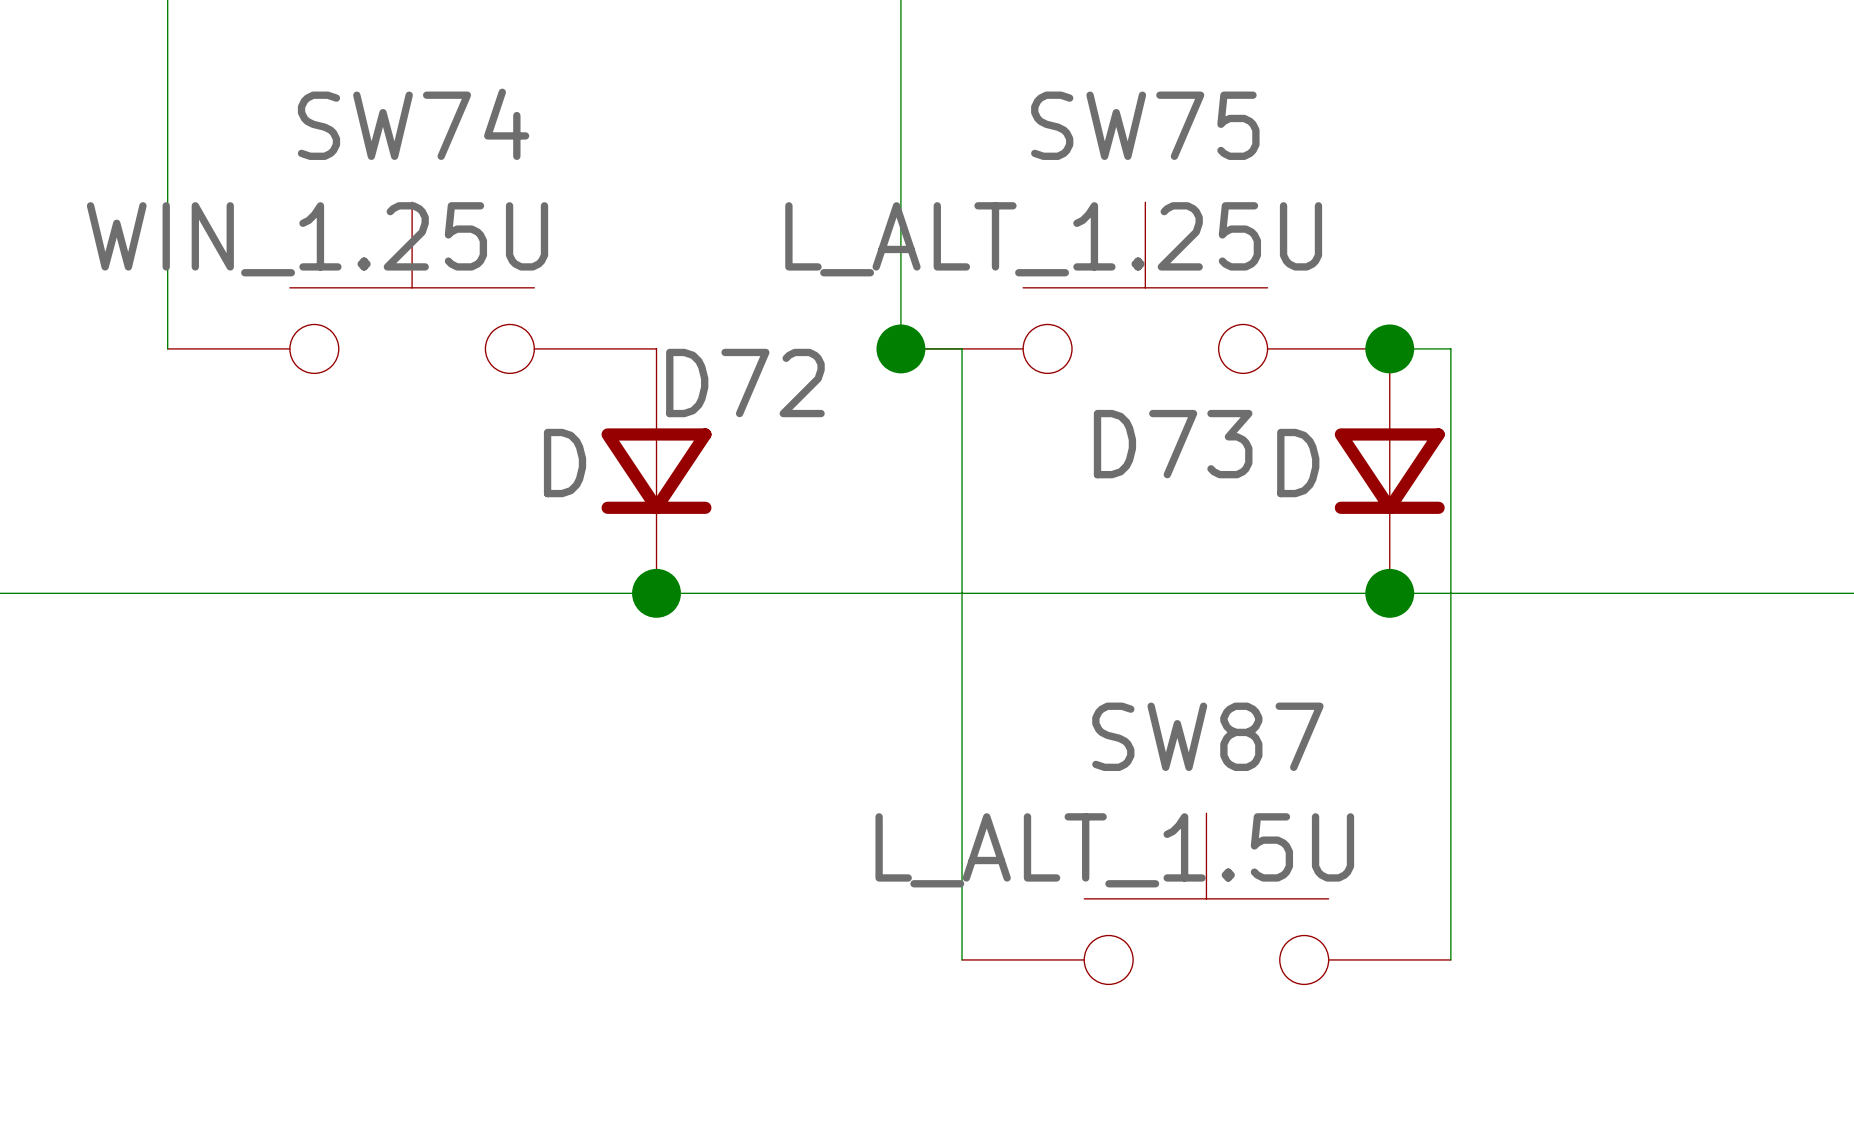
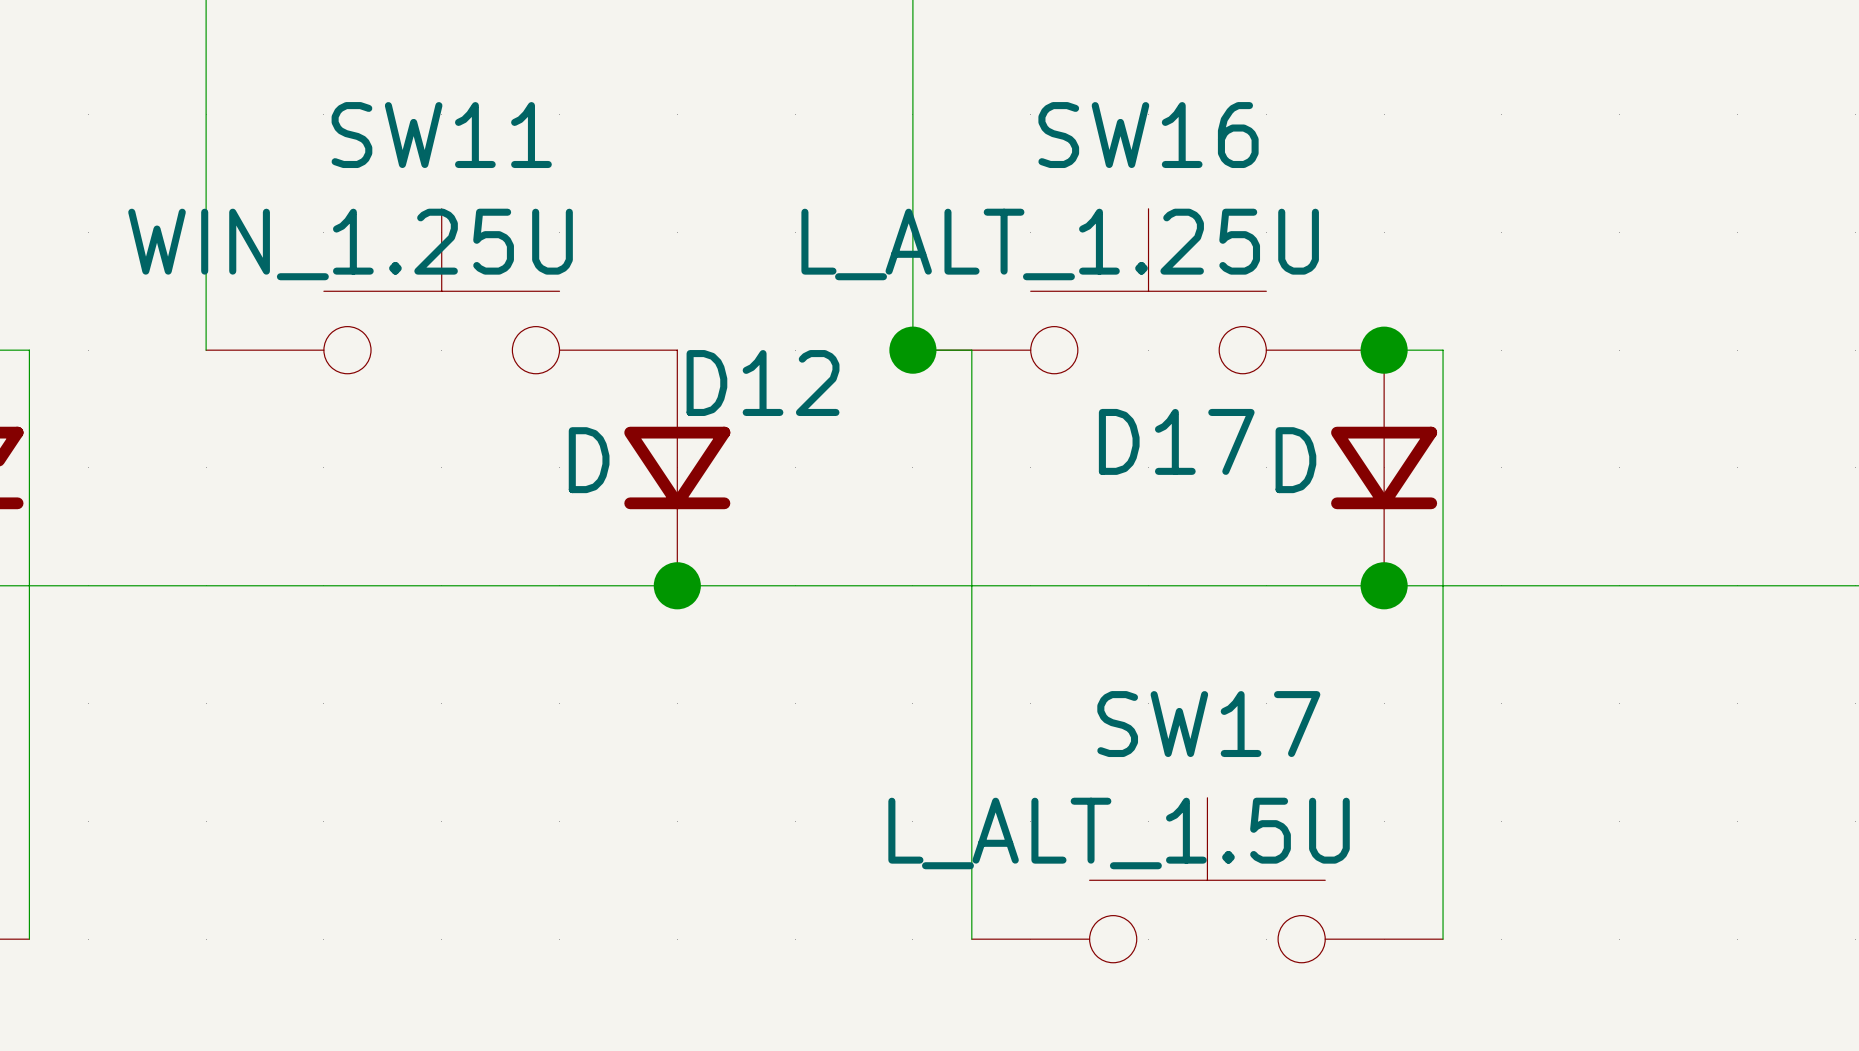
SW74 name: SW74 (413, 124) -> SW11 (441, 135)
SW75 name: SW75 (1145, 125) -> SW16 (1148, 135)
D72 name: D72 (745, 383) -> D12 (763, 383)
D73 name: D73 (1173, 444) -> D17 (1176, 441)
SW87 name: SW87 (1207, 736) -> SW17 (1208, 724)

